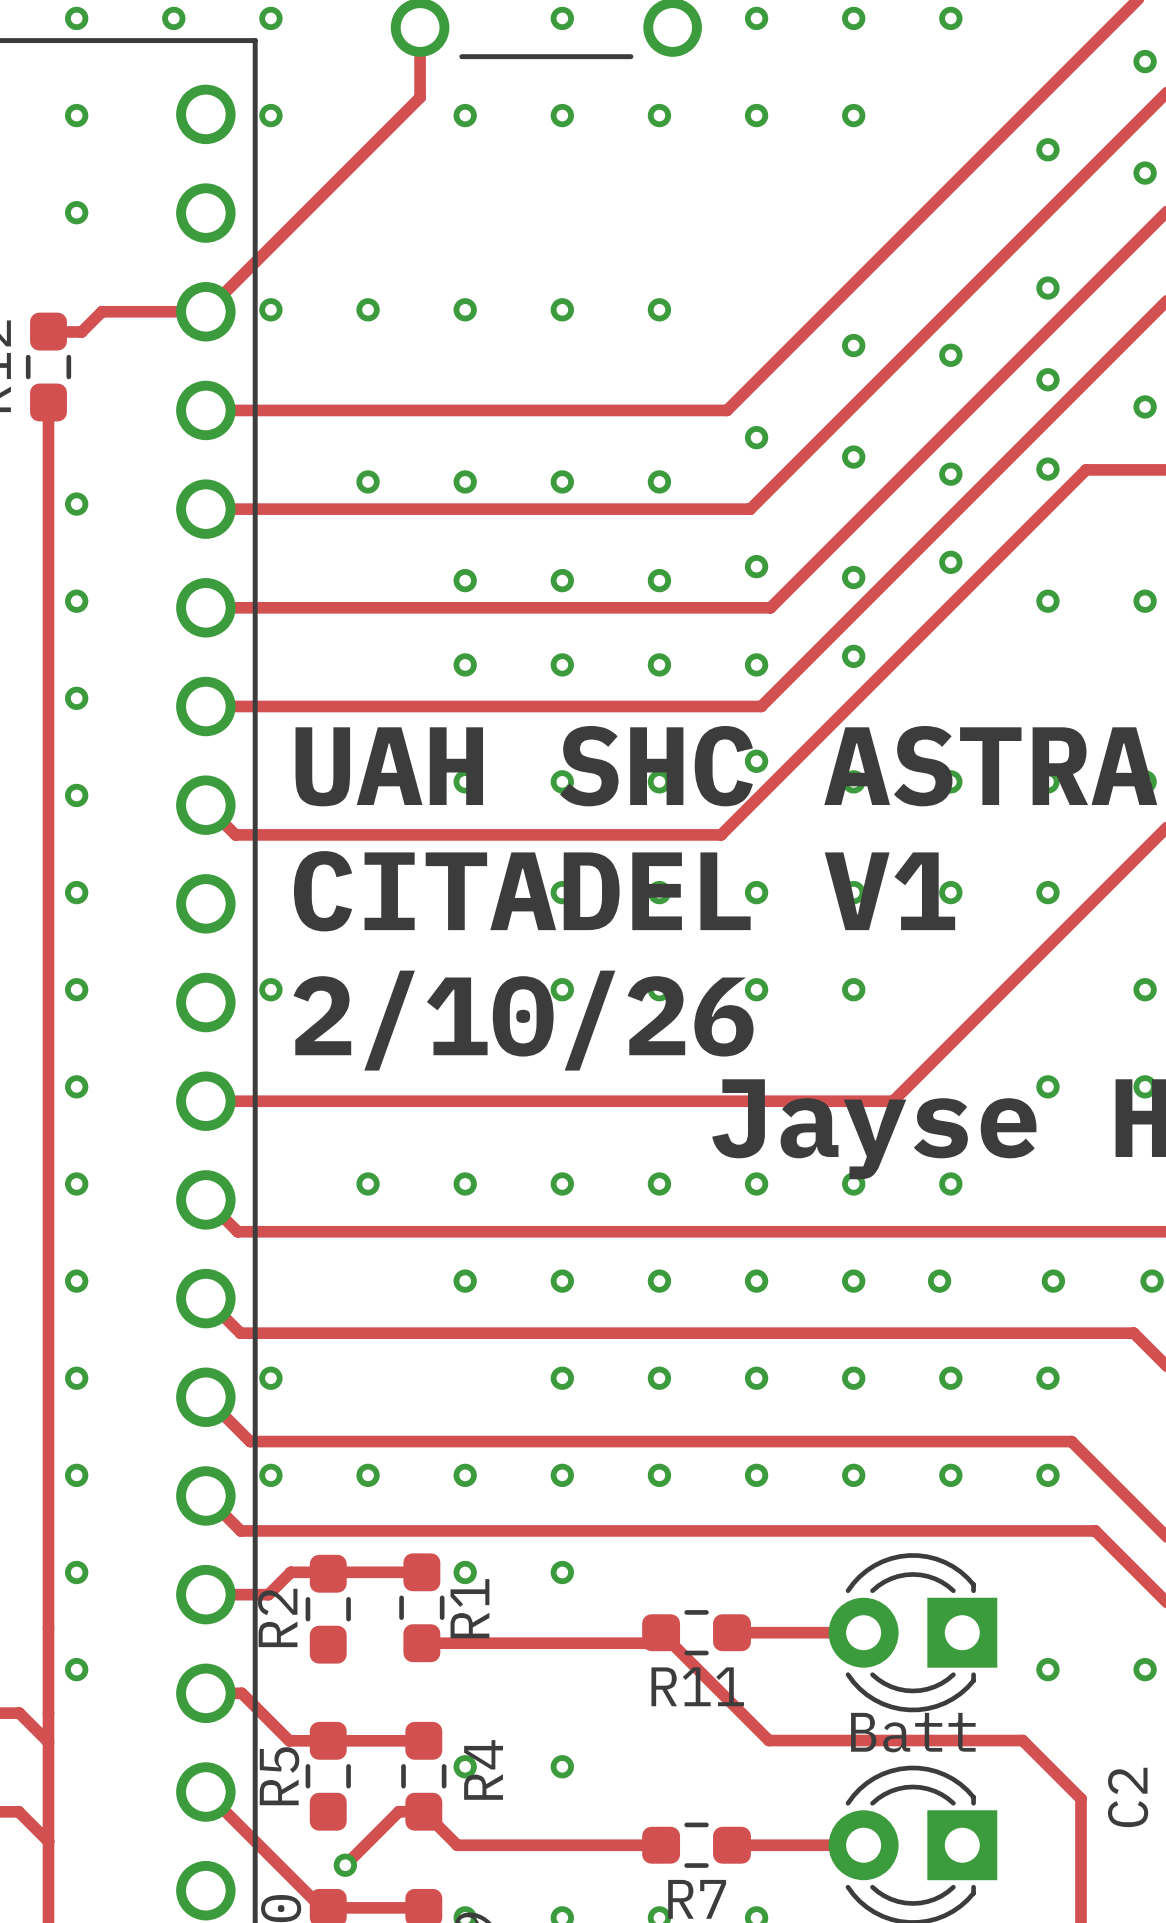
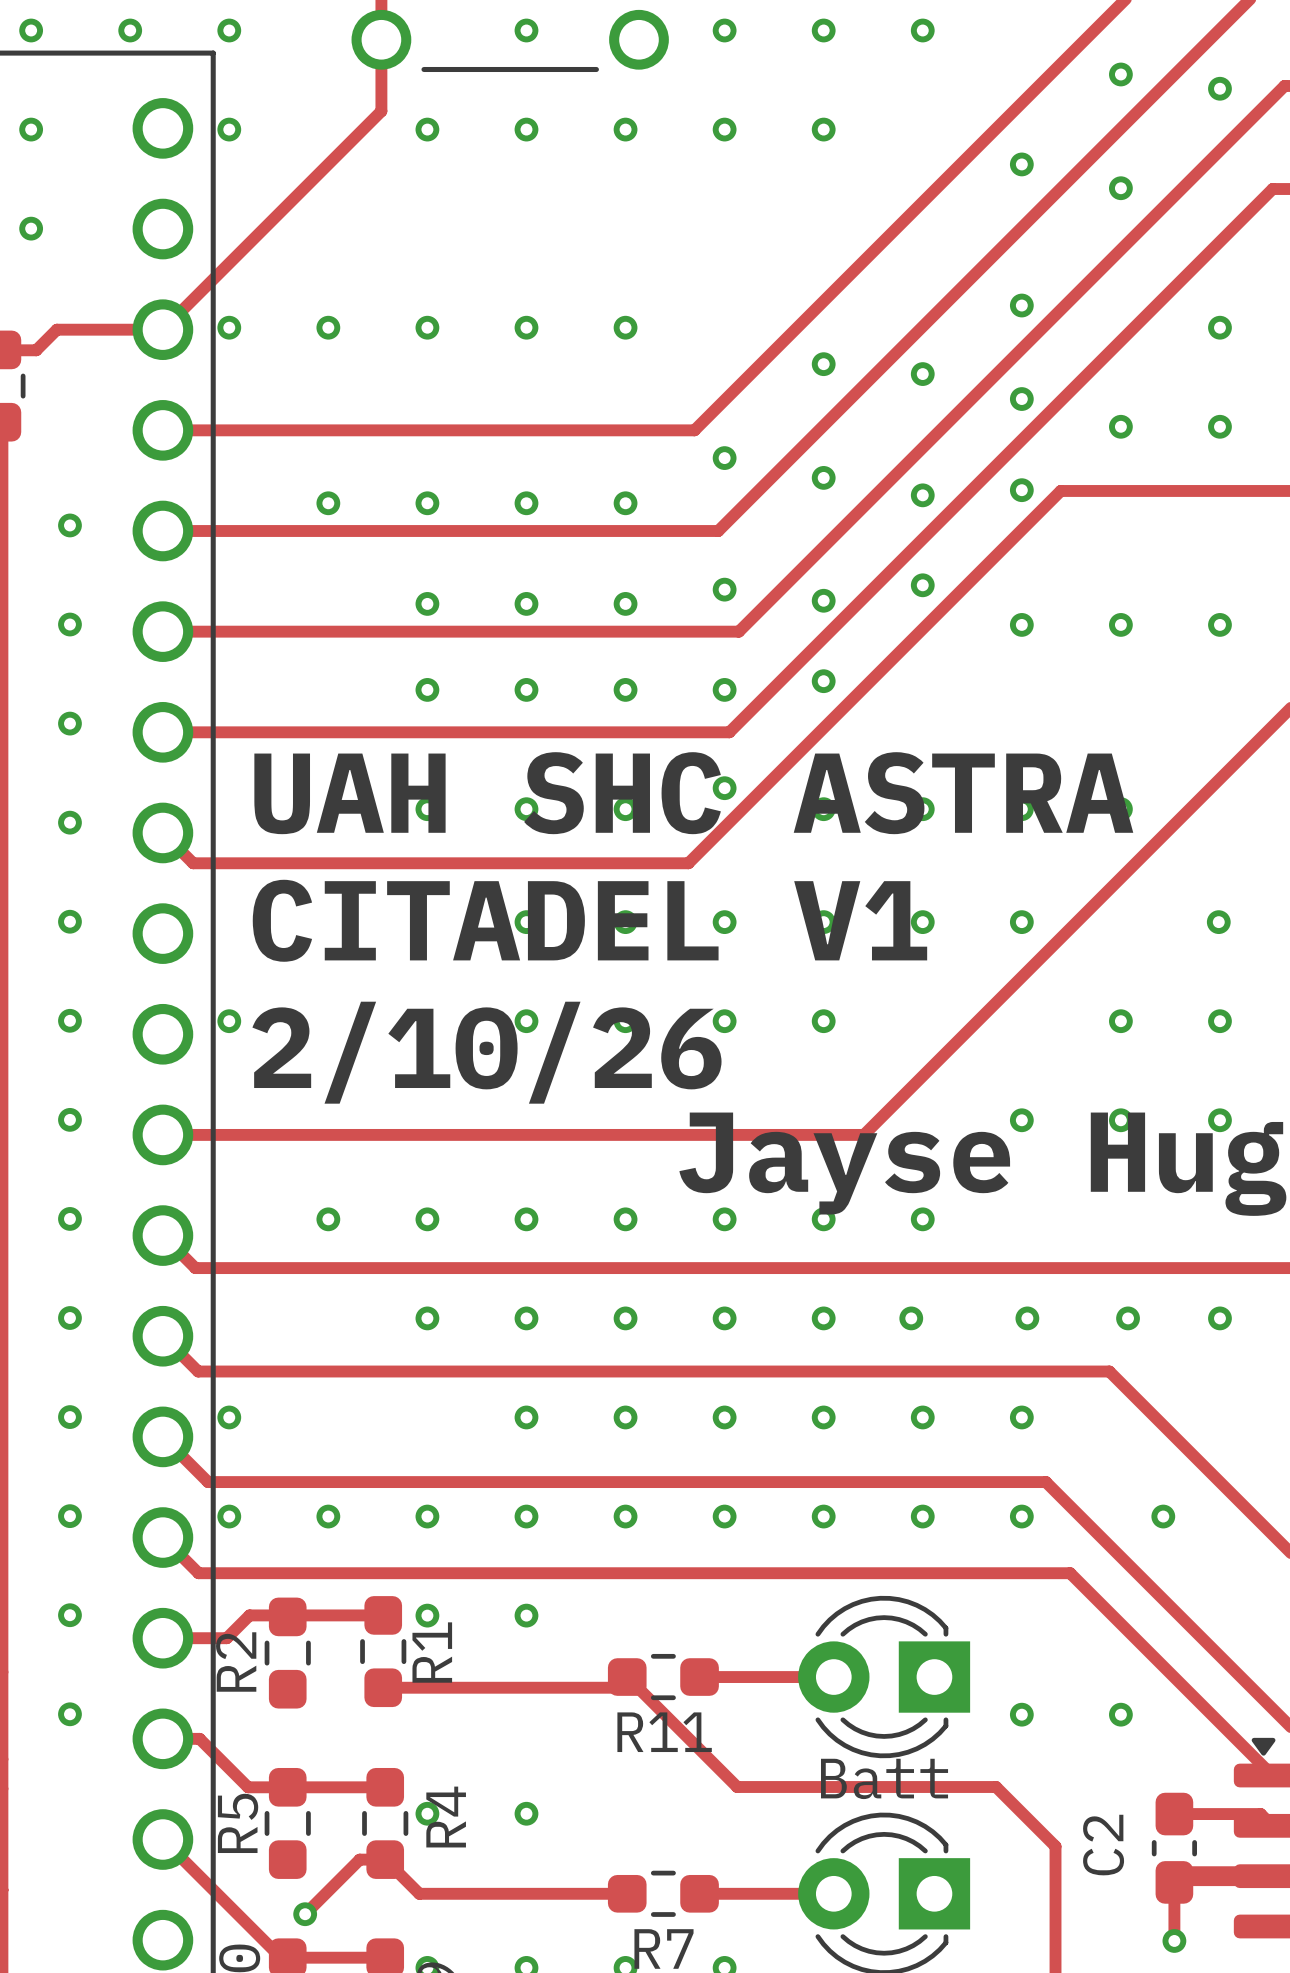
via position: (76, 504) -> (69, 525)
via position: (76, 601) -> (69, 624)
via position: (76, 698) -> (69, 723)
via position: (76, 795) -> (69, 822)
via position: (76, 892) -> (69, 921)
via position: (76, 989) -> (69, 1020)
via position: (76, 1086) -> (69, 1119)
via position: (76, 1183) -> (69, 1218)
via position: (76, 1281) -> (69, 1318)
via position: (76, 1378) -> (69, 1417)
via position: (76, 1475) -> (69, 1516)
via position: (76, 1572) -> (69, 1615)
via position: (76, 1669) -> (69, 1714)

